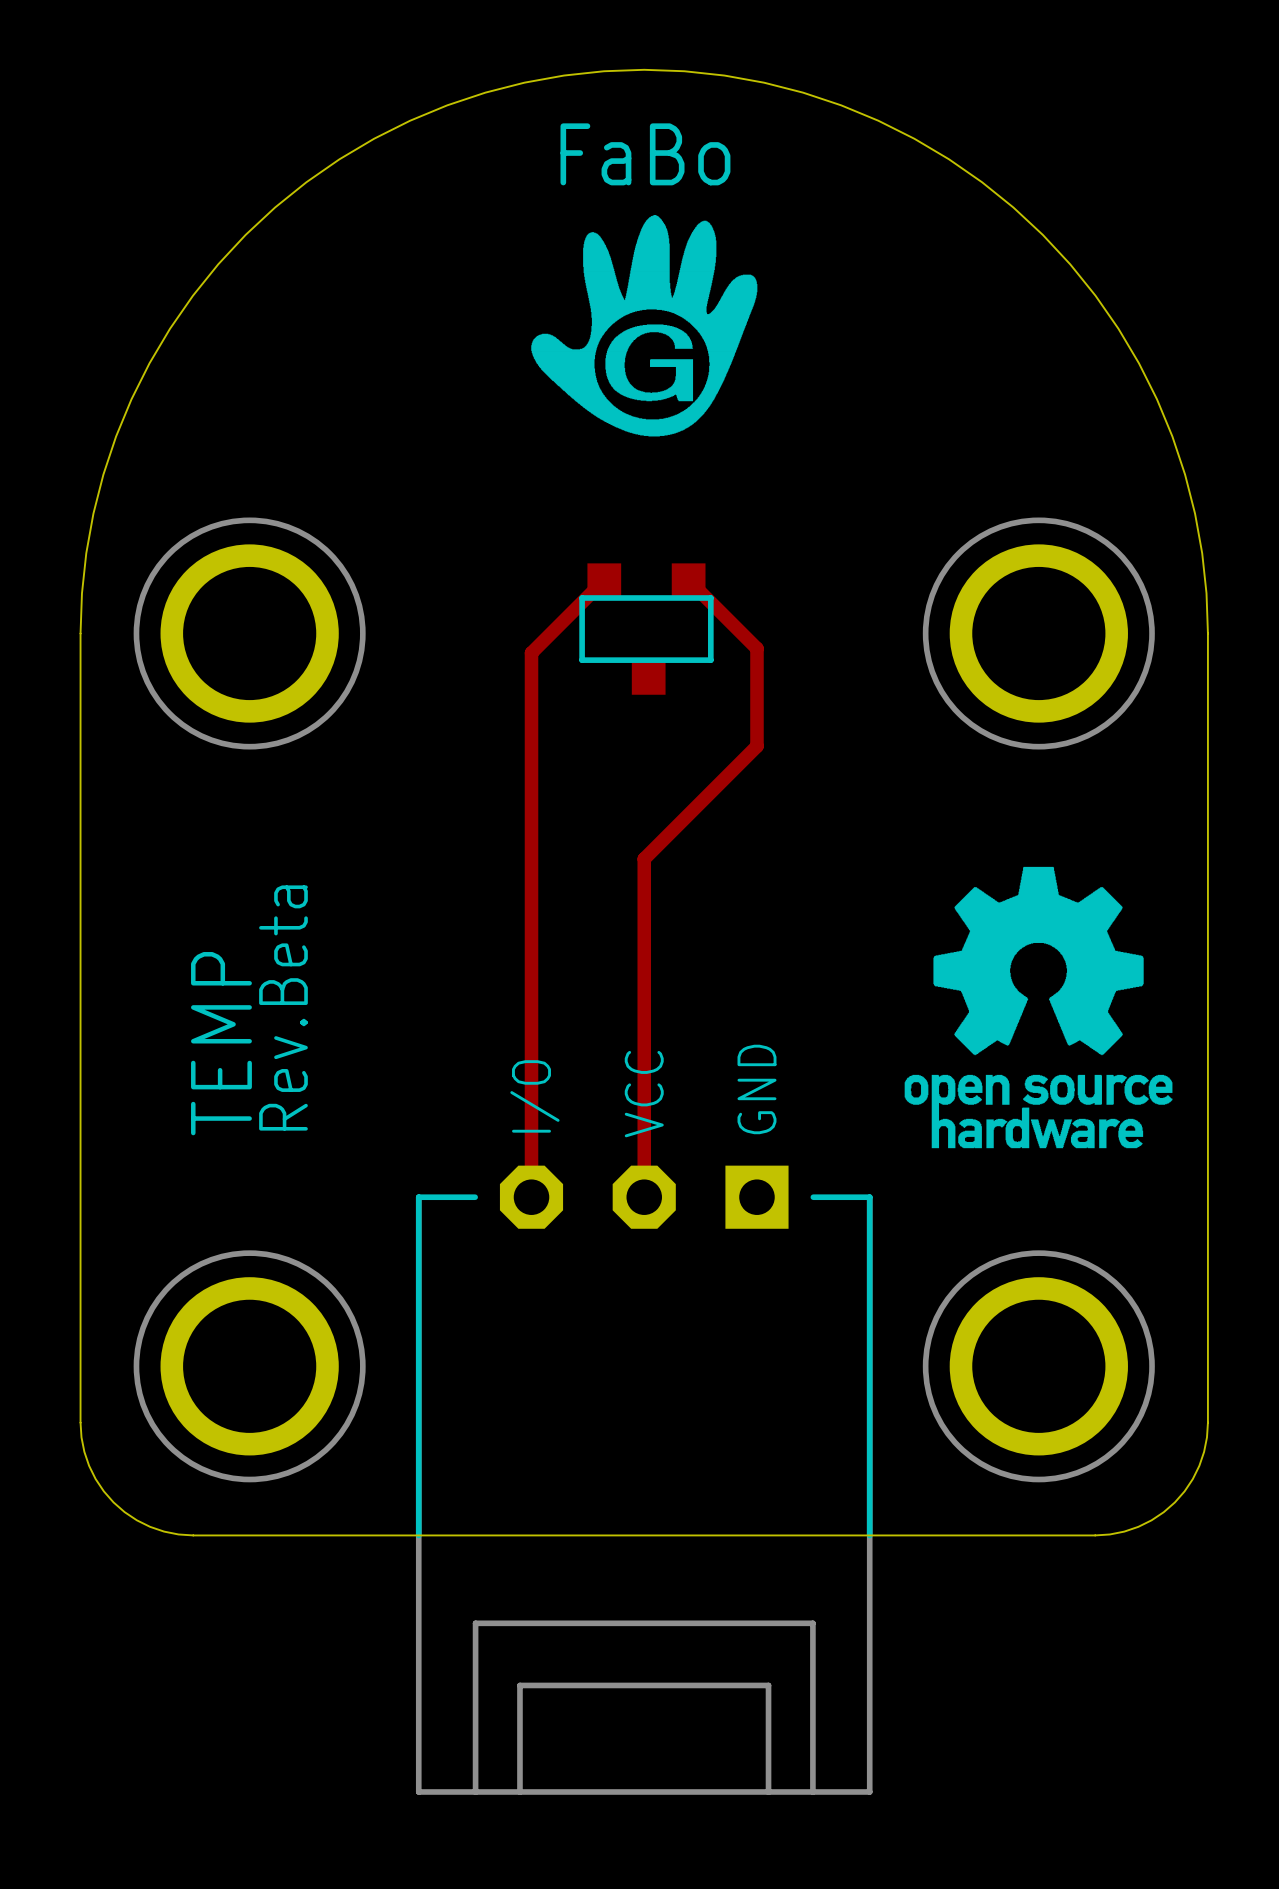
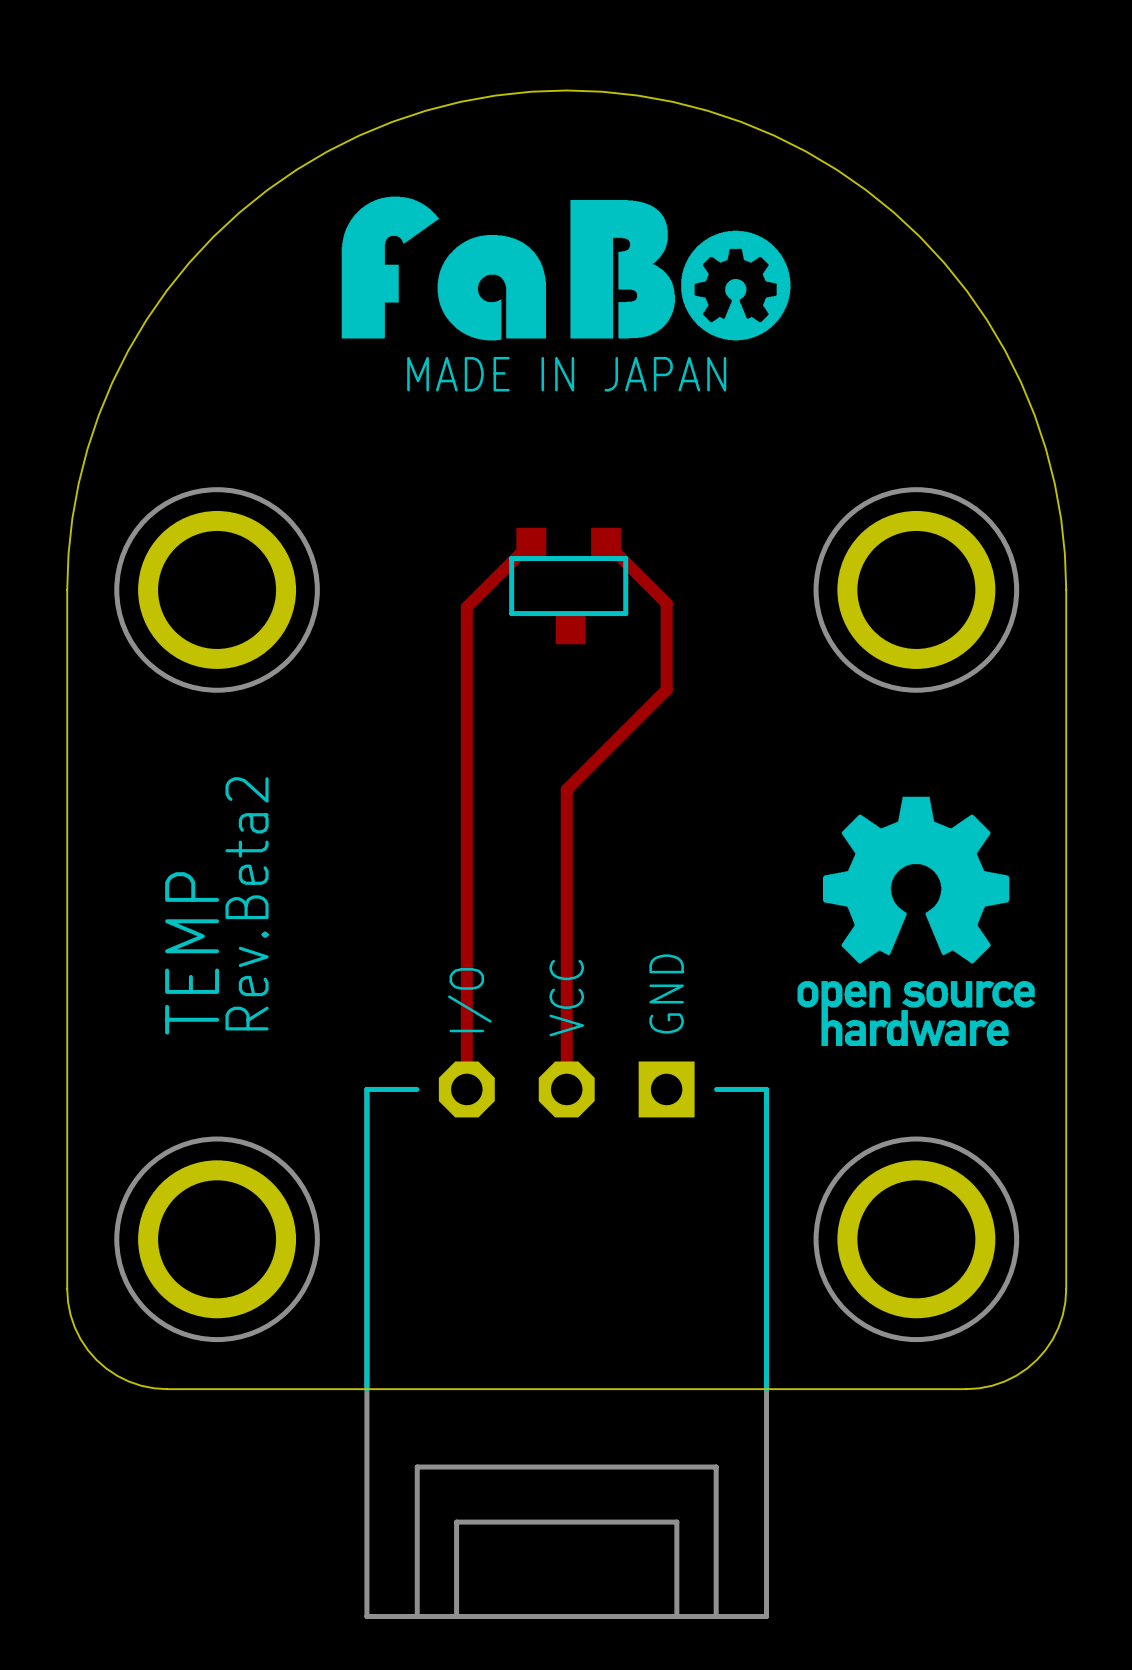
drawing: none -> [341, 196, 791, 341]
drawing: [531, 215, 758, 437] -> none
text: none -> MADE IN JAPAN (566, 374)
text: Rev.Beta (283, 1008) -> Rev.Beta2 (247, 903)

